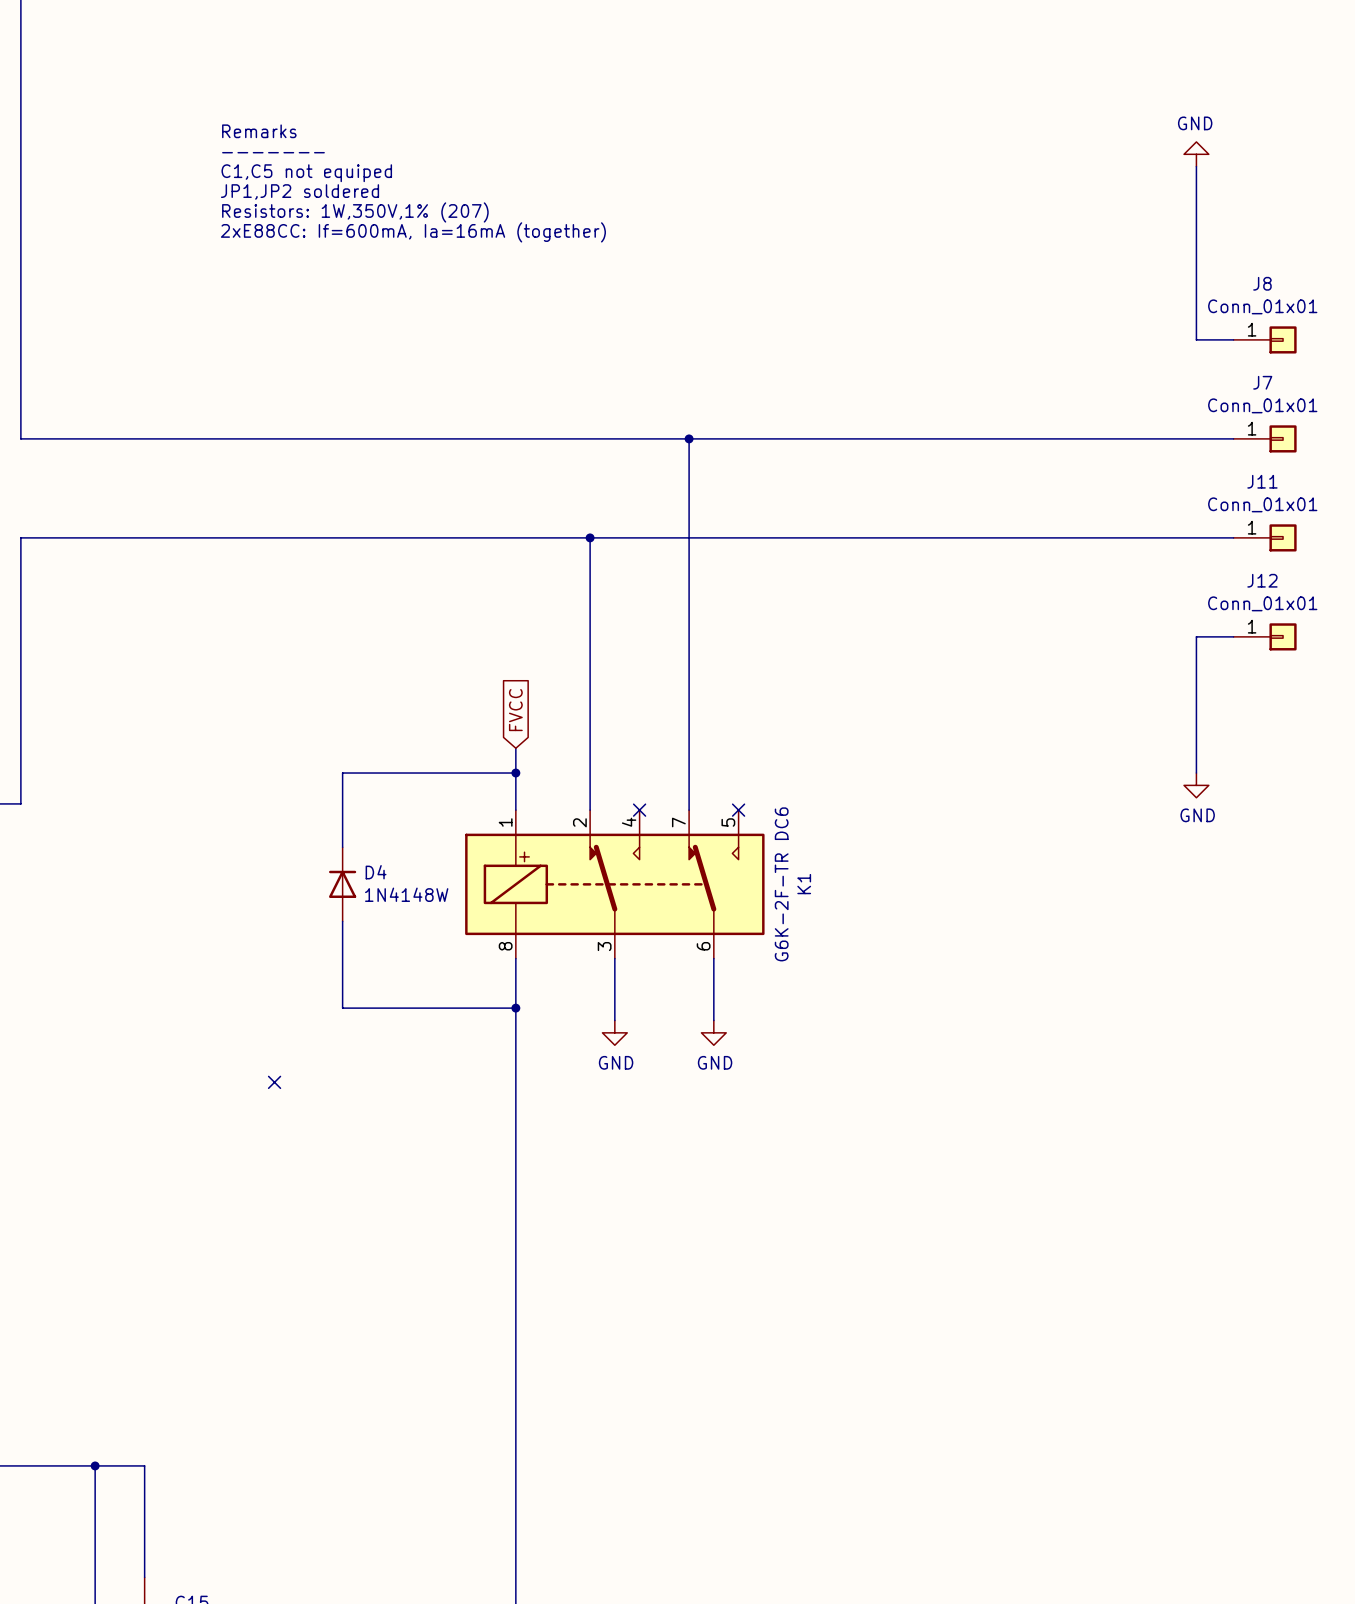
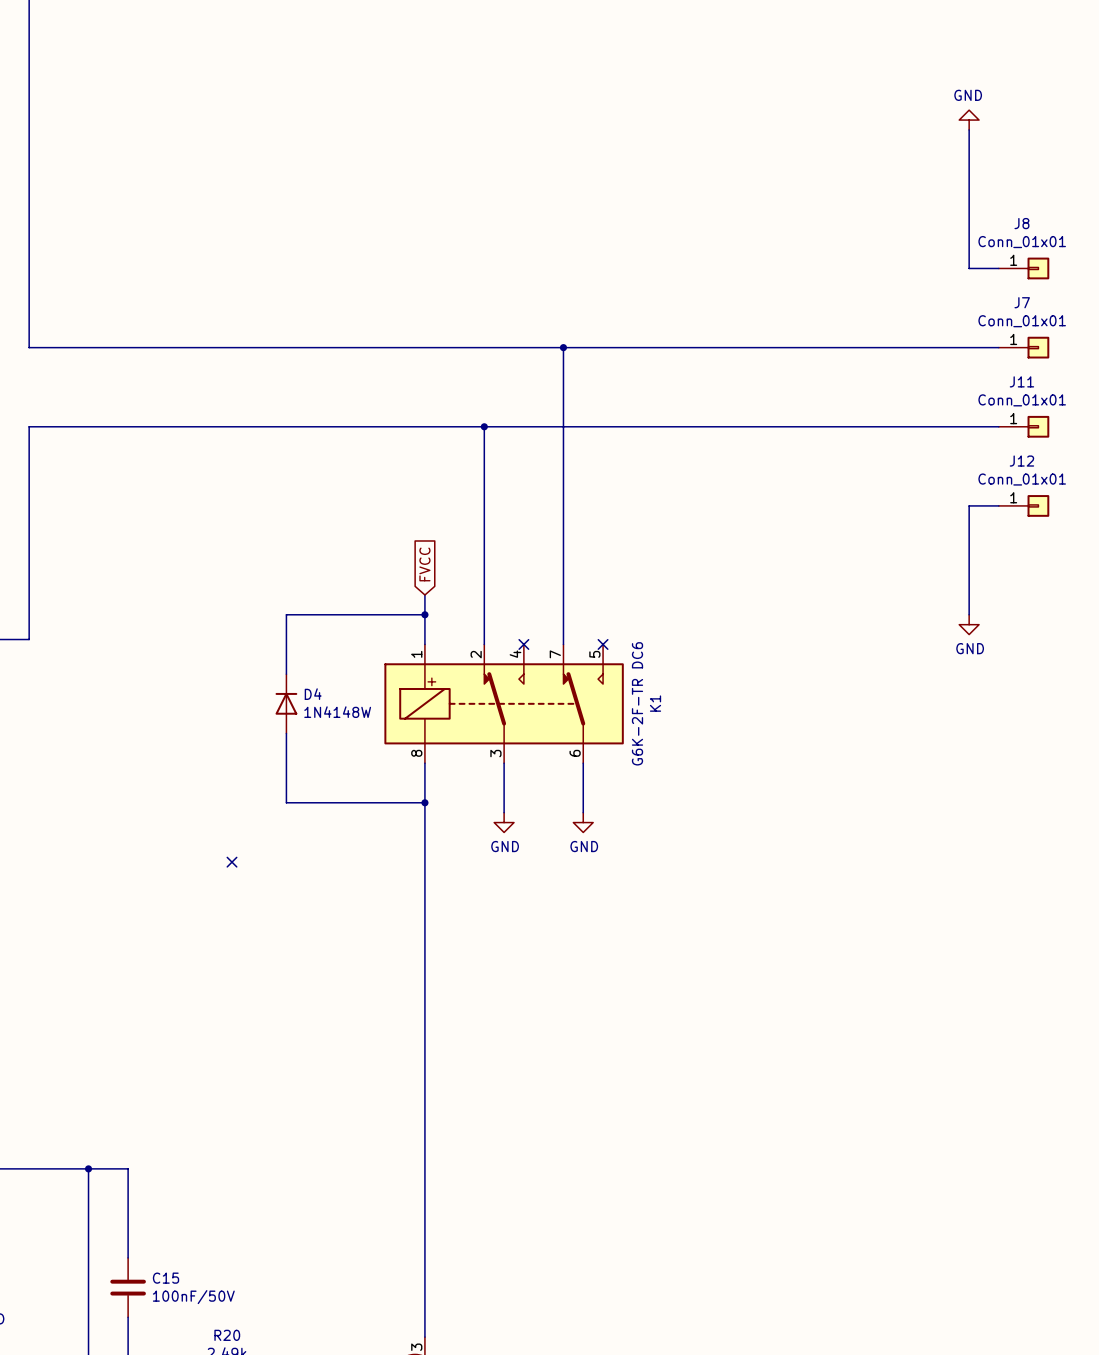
text: Remarks (259, 131) -> none
text: ------- (273, 152) -> none
text: C1,C5 not equiped (306, 173) -> none
text: JP1,JP2 soldered (299, 191) -> none
text: Resistors: 1W,350V,1% (207) (355, 212) -> none
text: 2xE88CC: If=600mA, Ia=16mA (together) (413, 232) -> none

